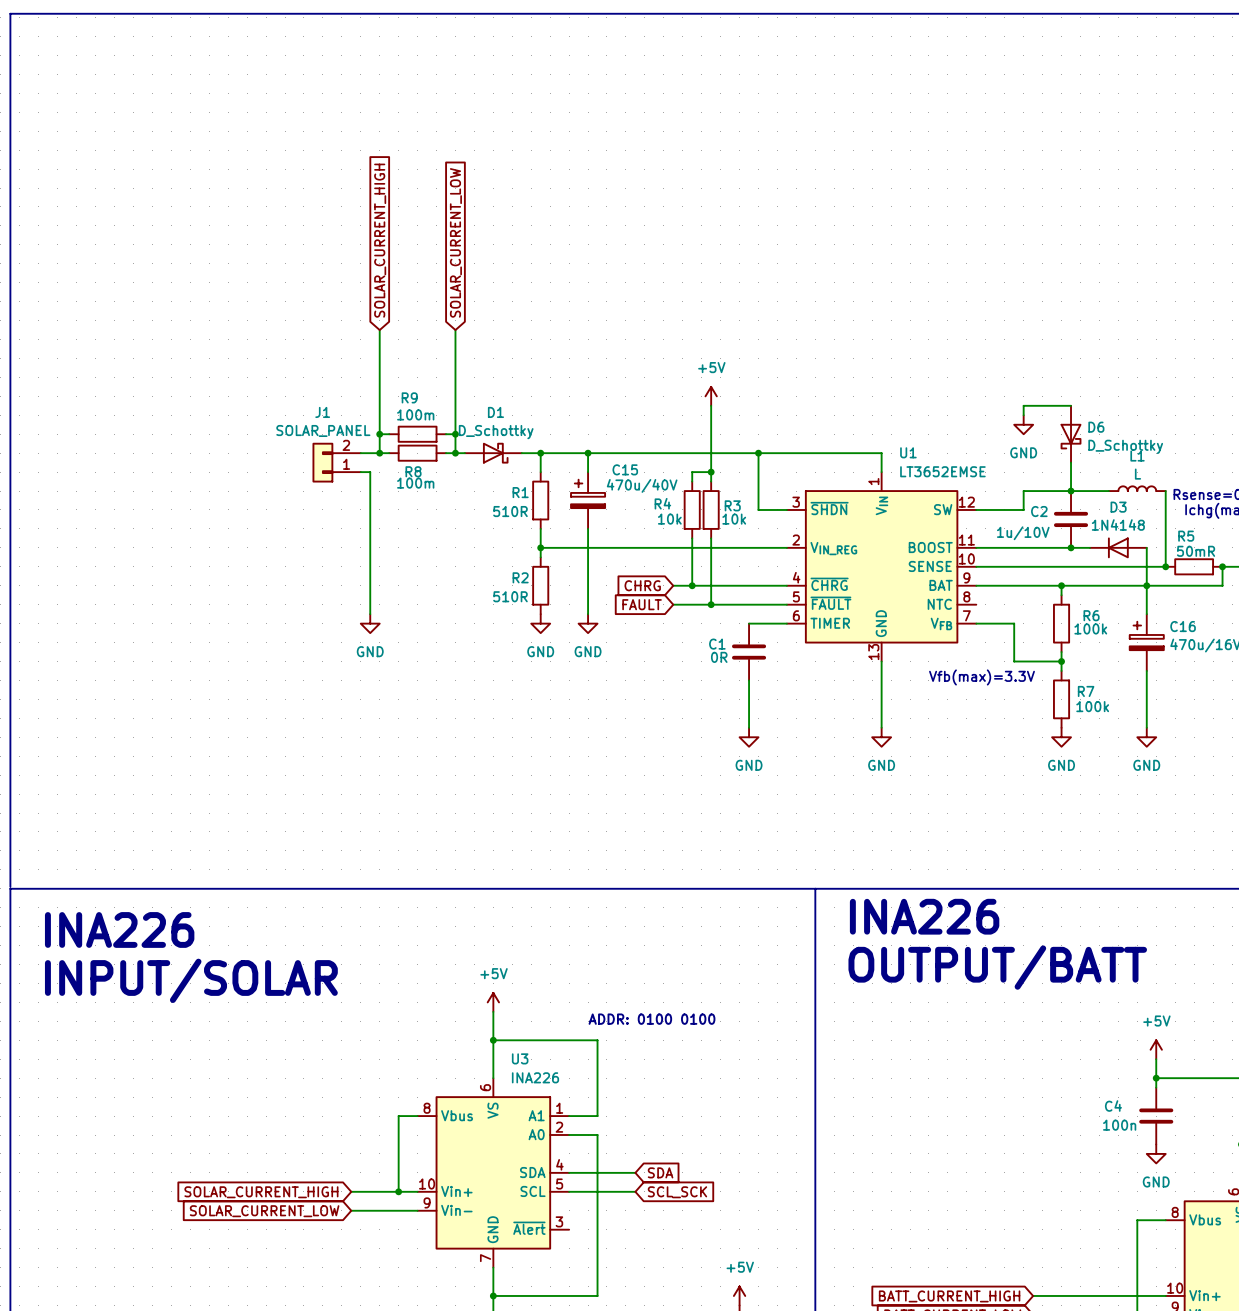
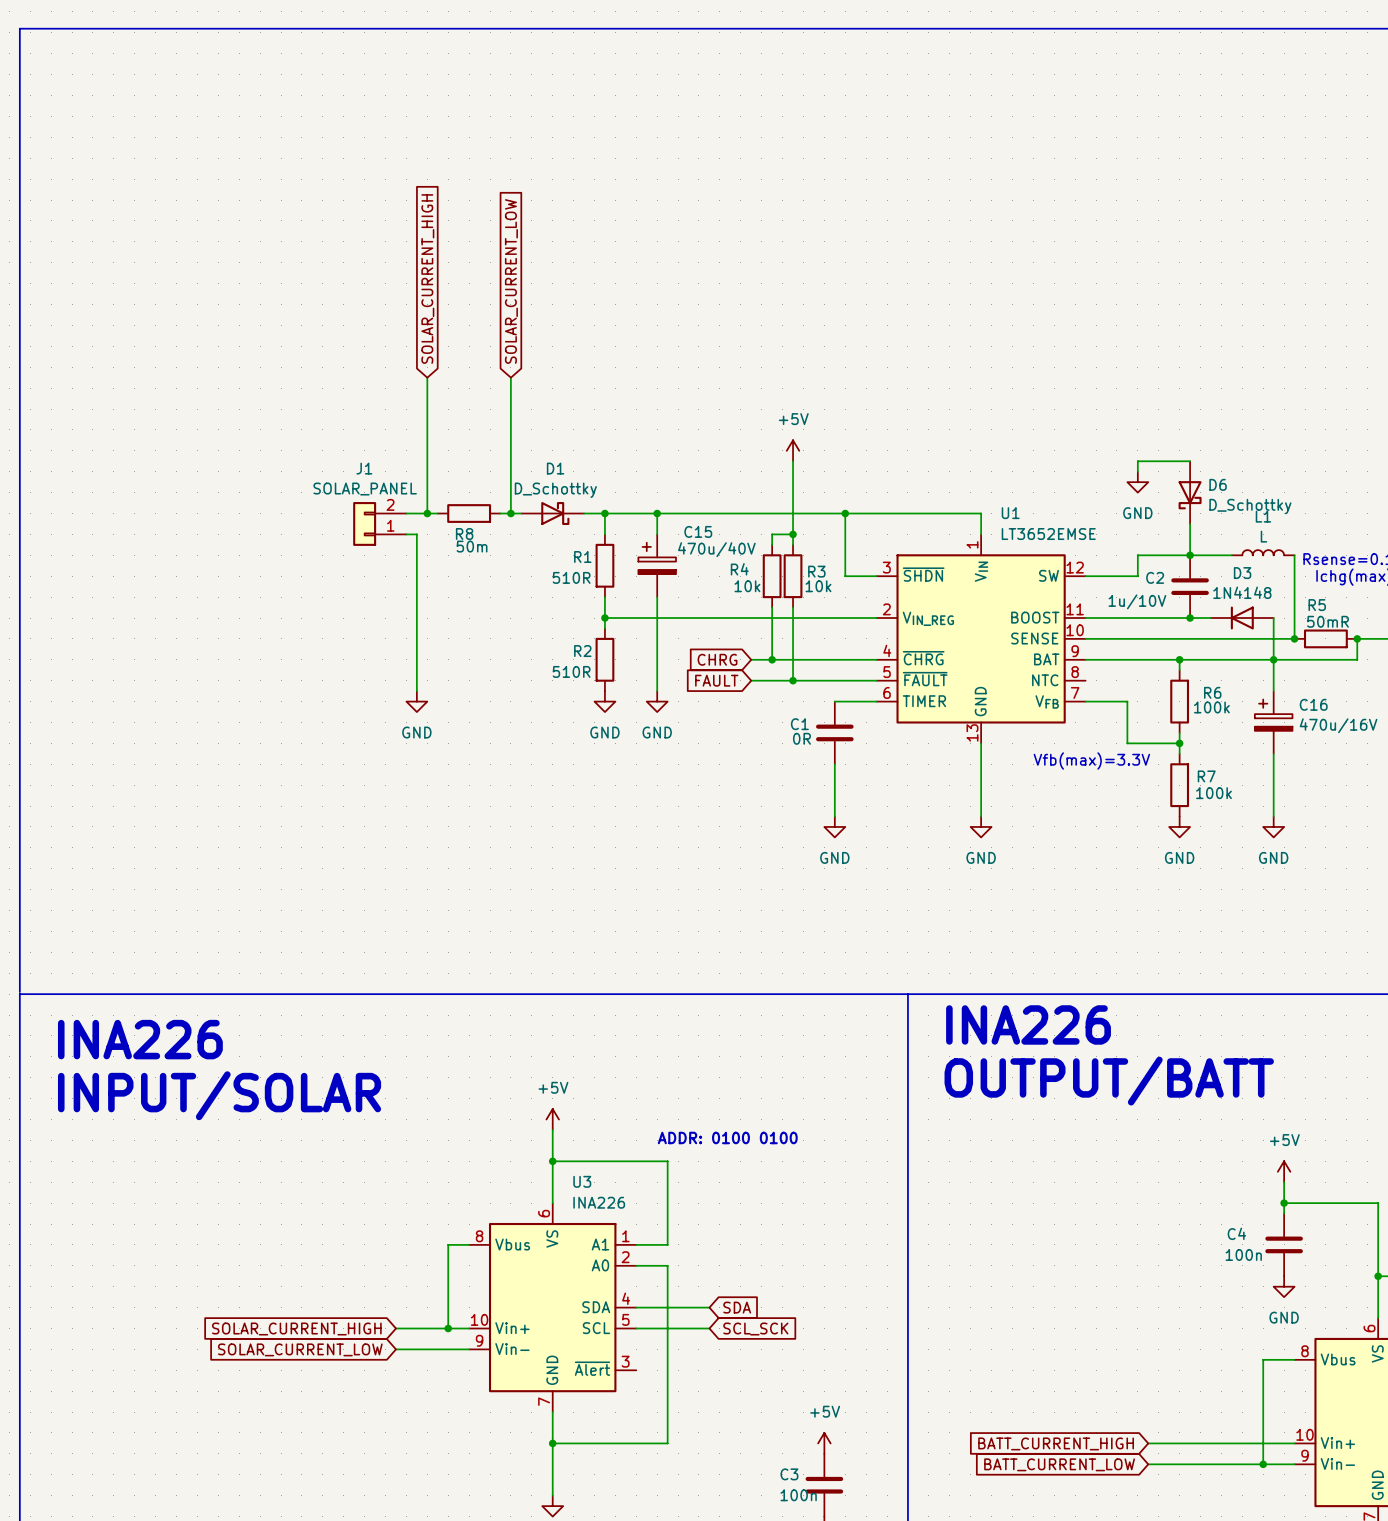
wire: (379, 434) (389, 434) -> none
junction: (379, 434) -> none
R9: 100m (417, 434) -> none
wire: (446, 434) (455, 434) -> none
junction: (455, 434) -> none
R8 value: 100m (415, 483) -> 50m (472, 546)

